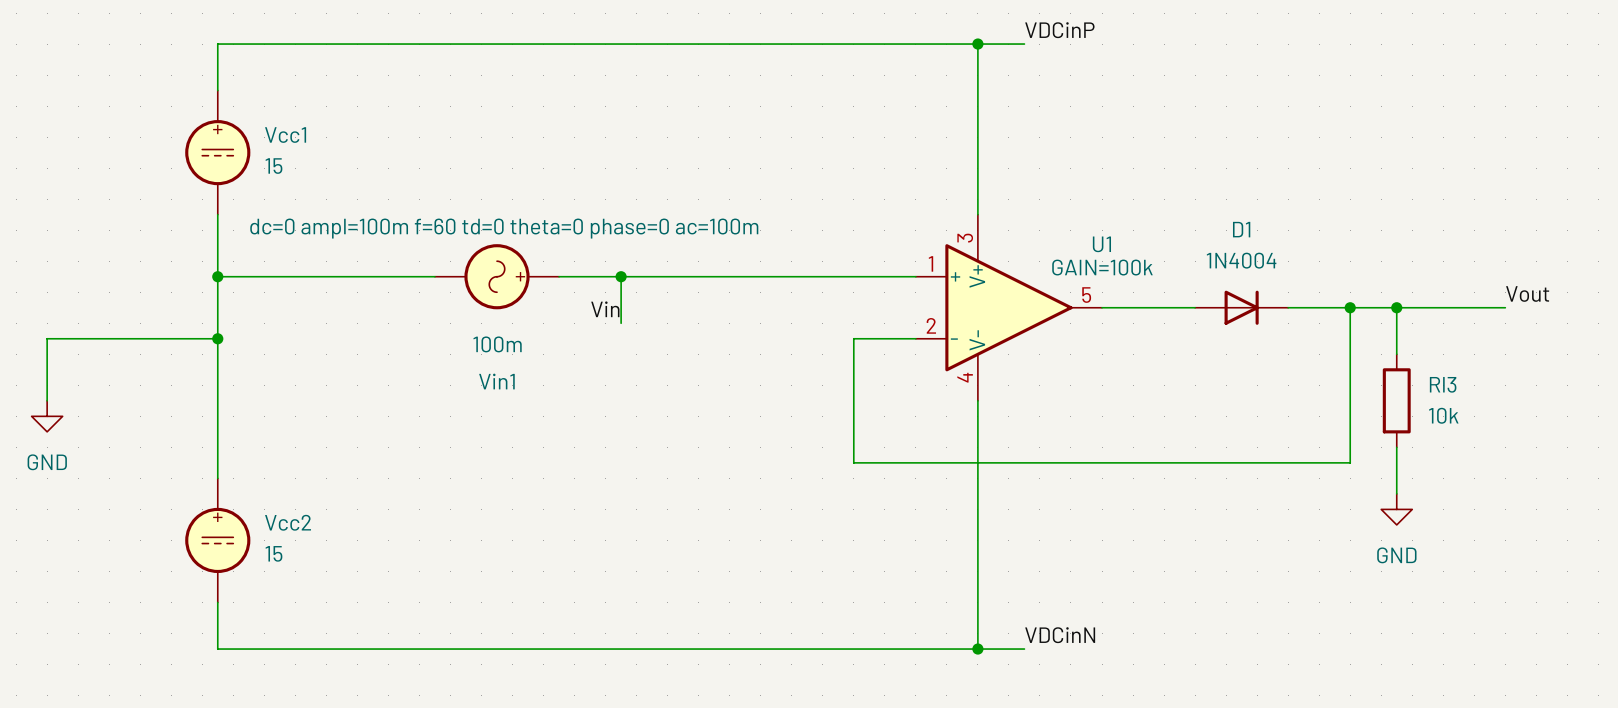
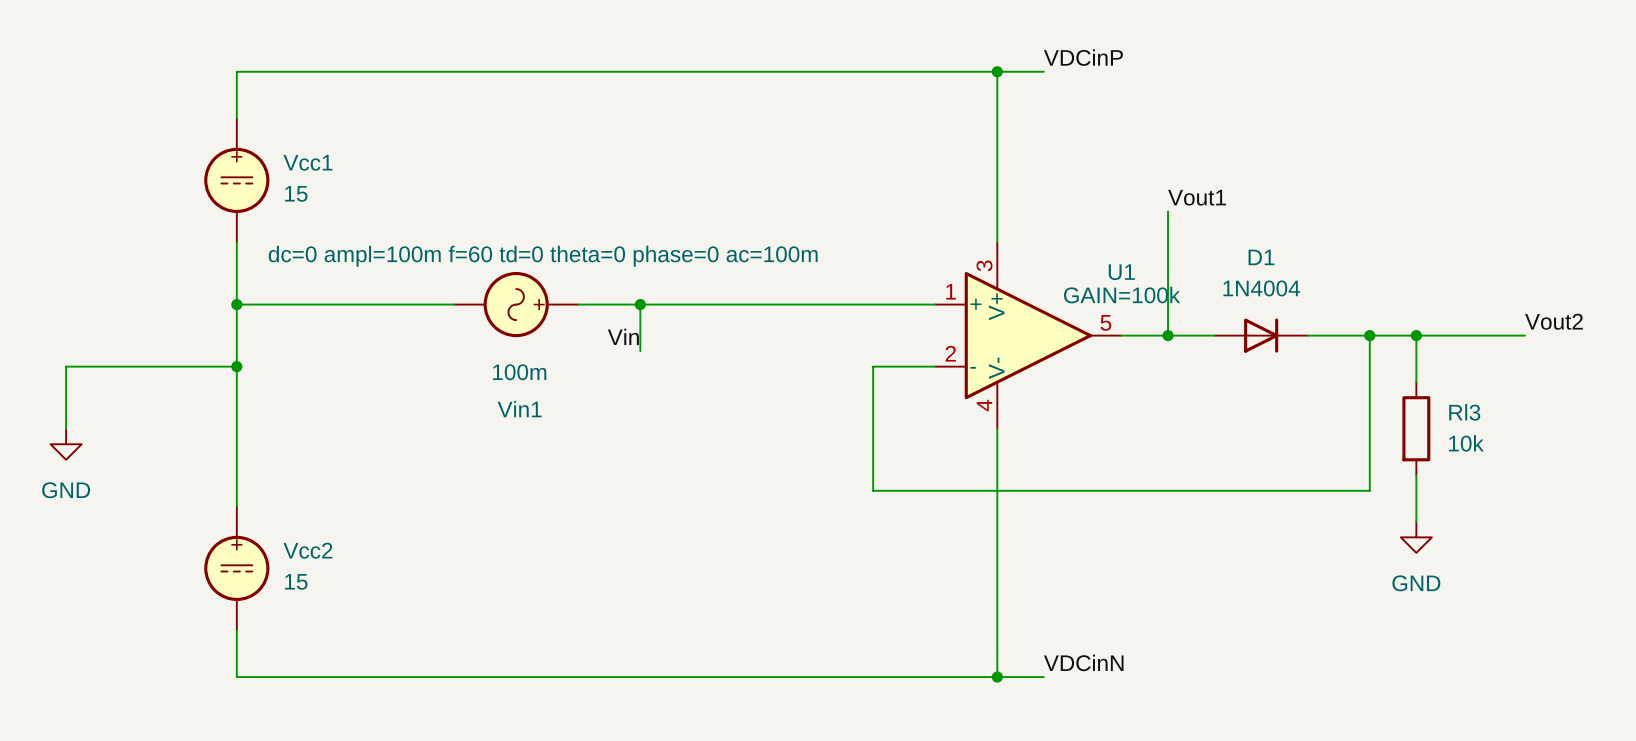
label: none -> Vout1 (1197, 197)
wire: none -> (1168, 211) (1168, 335)
label: Vout (1527, 293) -> Vout2 (1553, 321)
junction: none -> (1168, 335)

